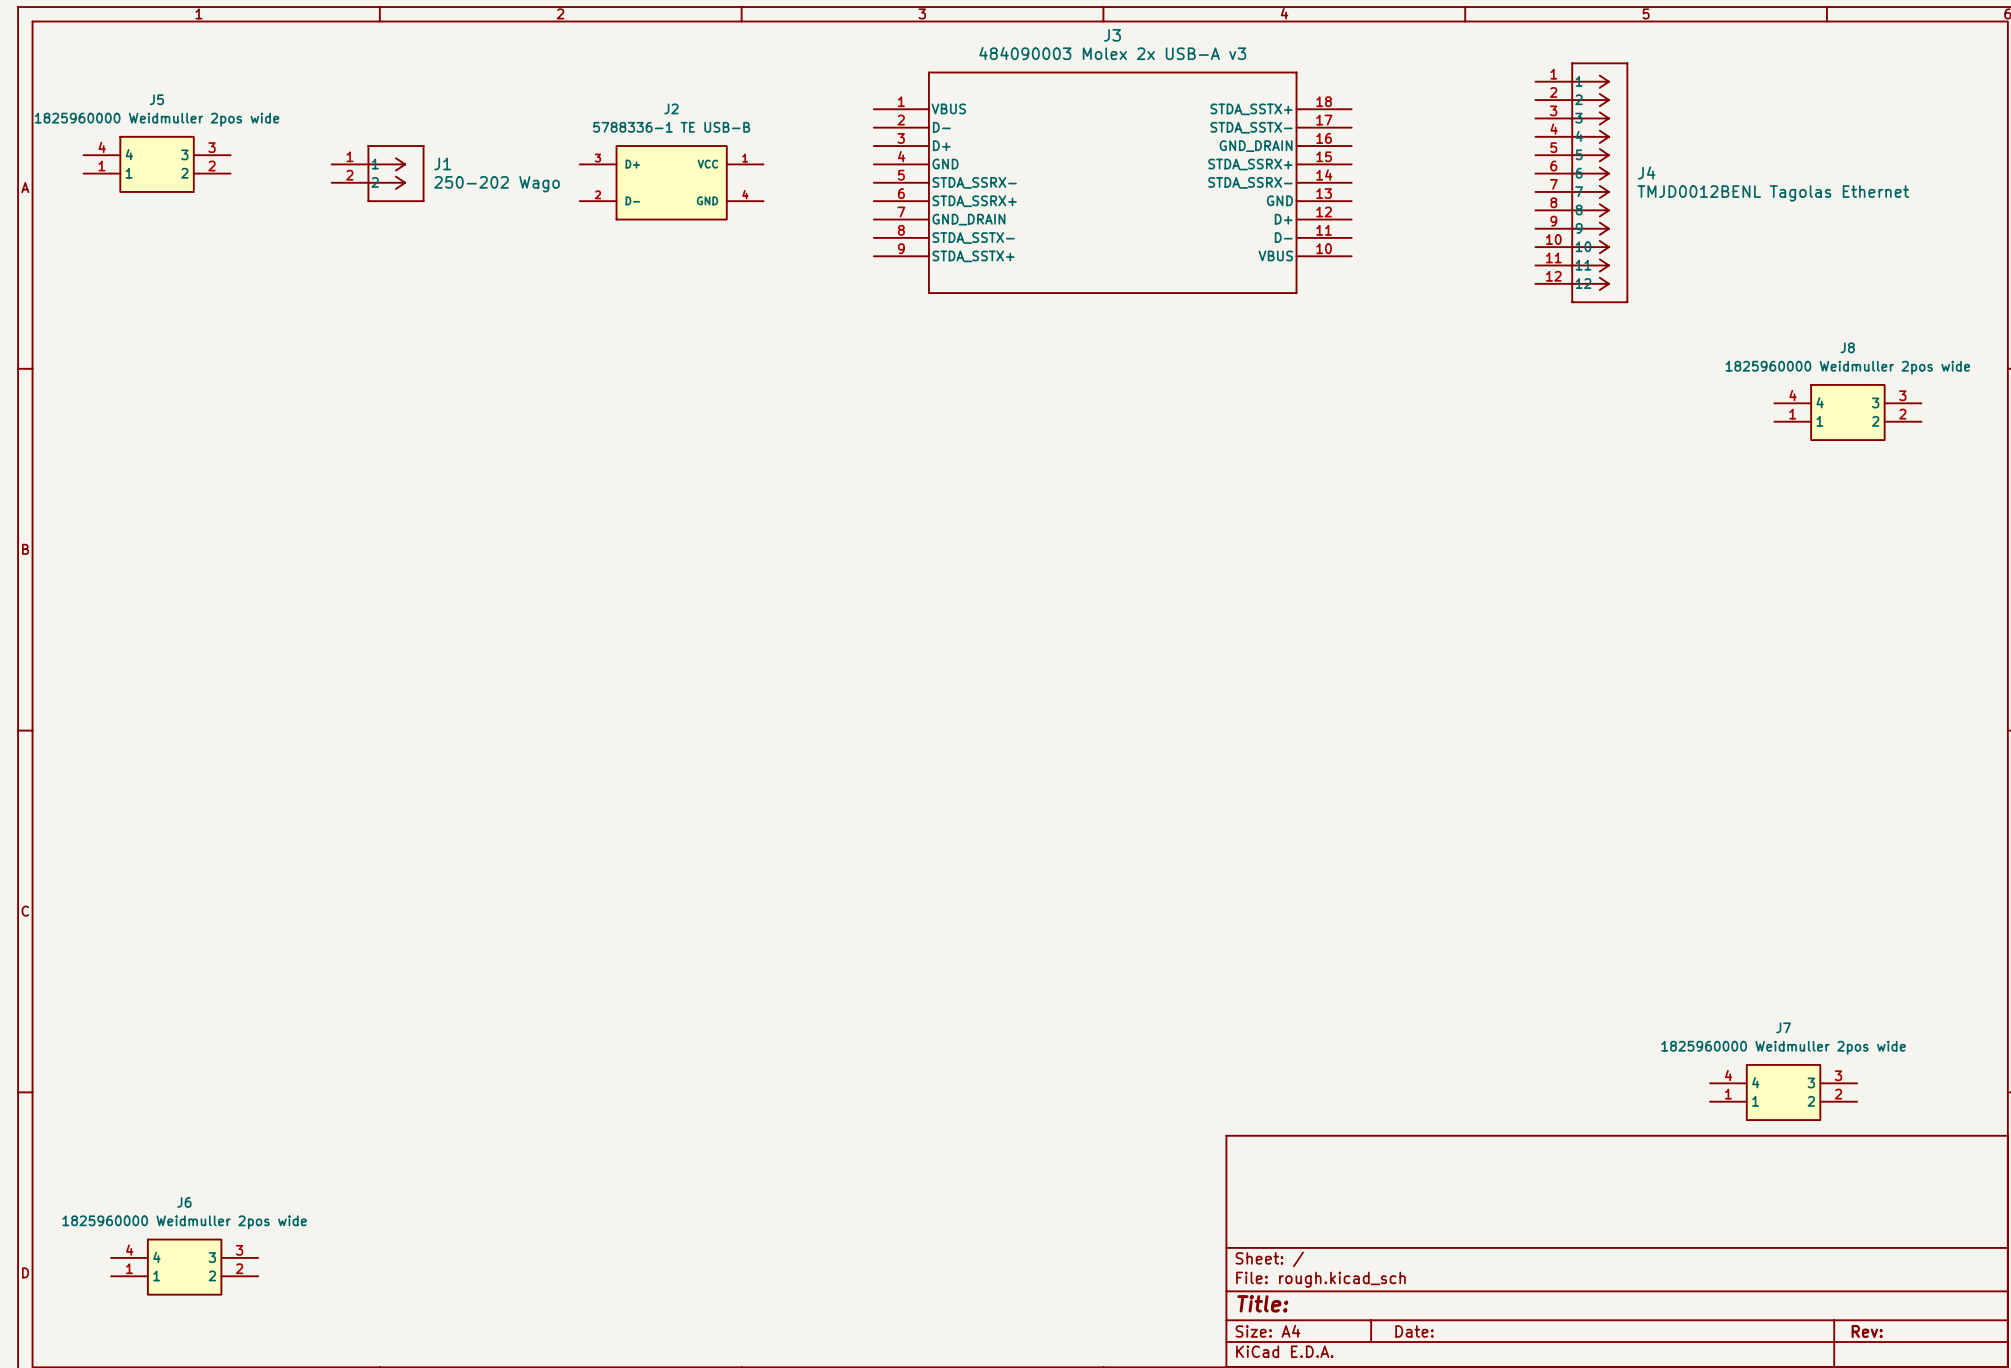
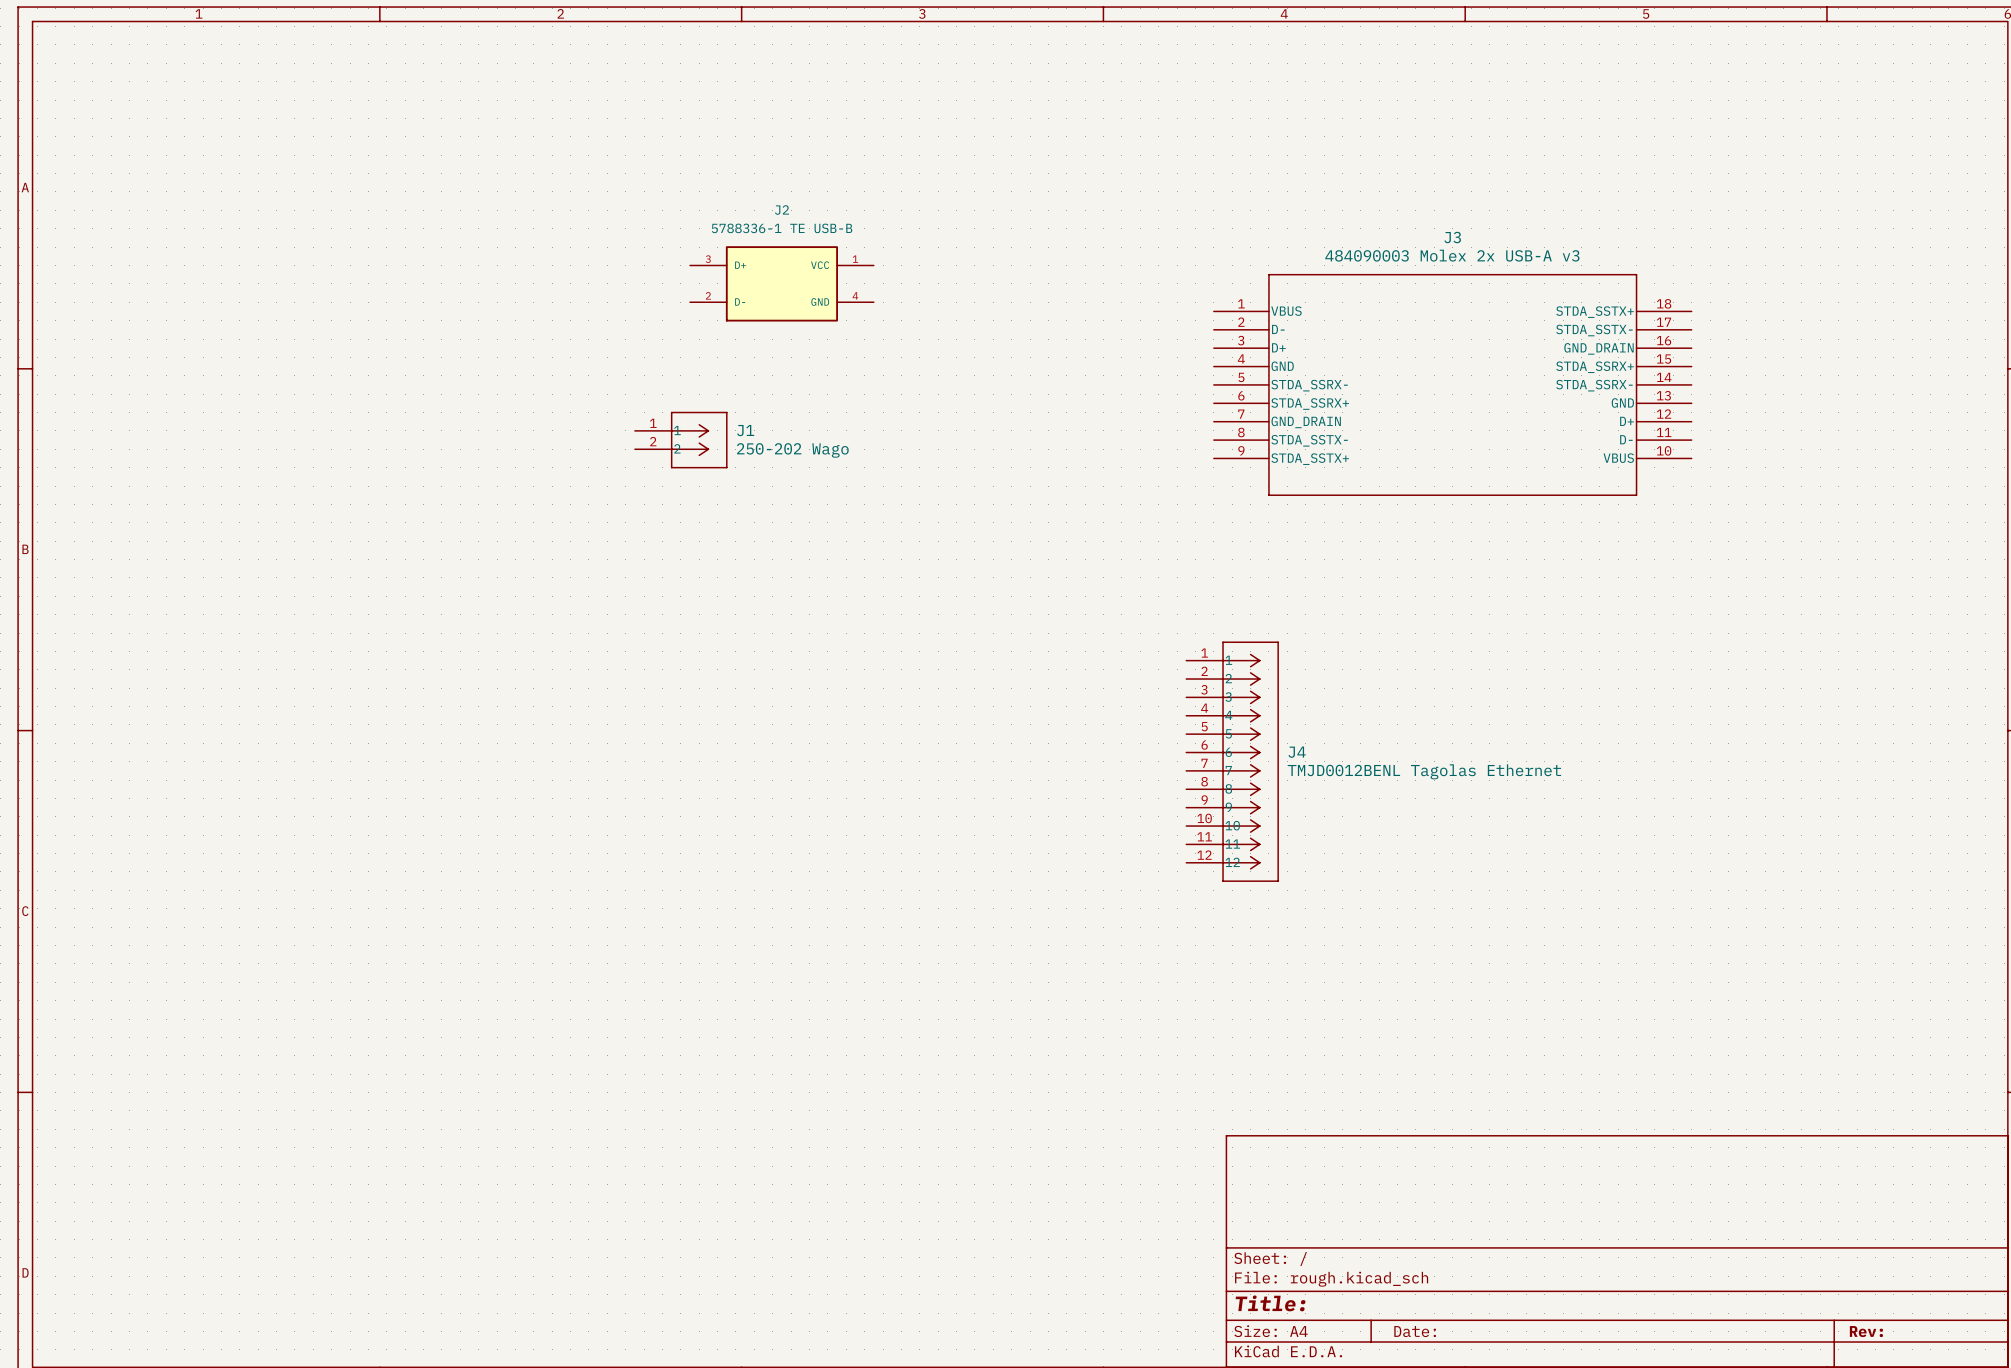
J5: 1825960000 Weidmuller 2pos wide (157, 164) -> none
J1 position: (377, 173) -> (681, 440)
J2 position: (671, 182) -> (781, 283)
J3 position: (1112, 182) -> (1452, 384)
J4 position: (1581, 182) -> (1232, 761)
J8: 1825960000 Weidmuller 2pos wide (1847, 412) -> none
J7: 1825960000 Weidmuller 2pos wide (1783, 1092) -> none
J6: 1825960000 Weidmuller 2pos wide (184, 1267) -> none

